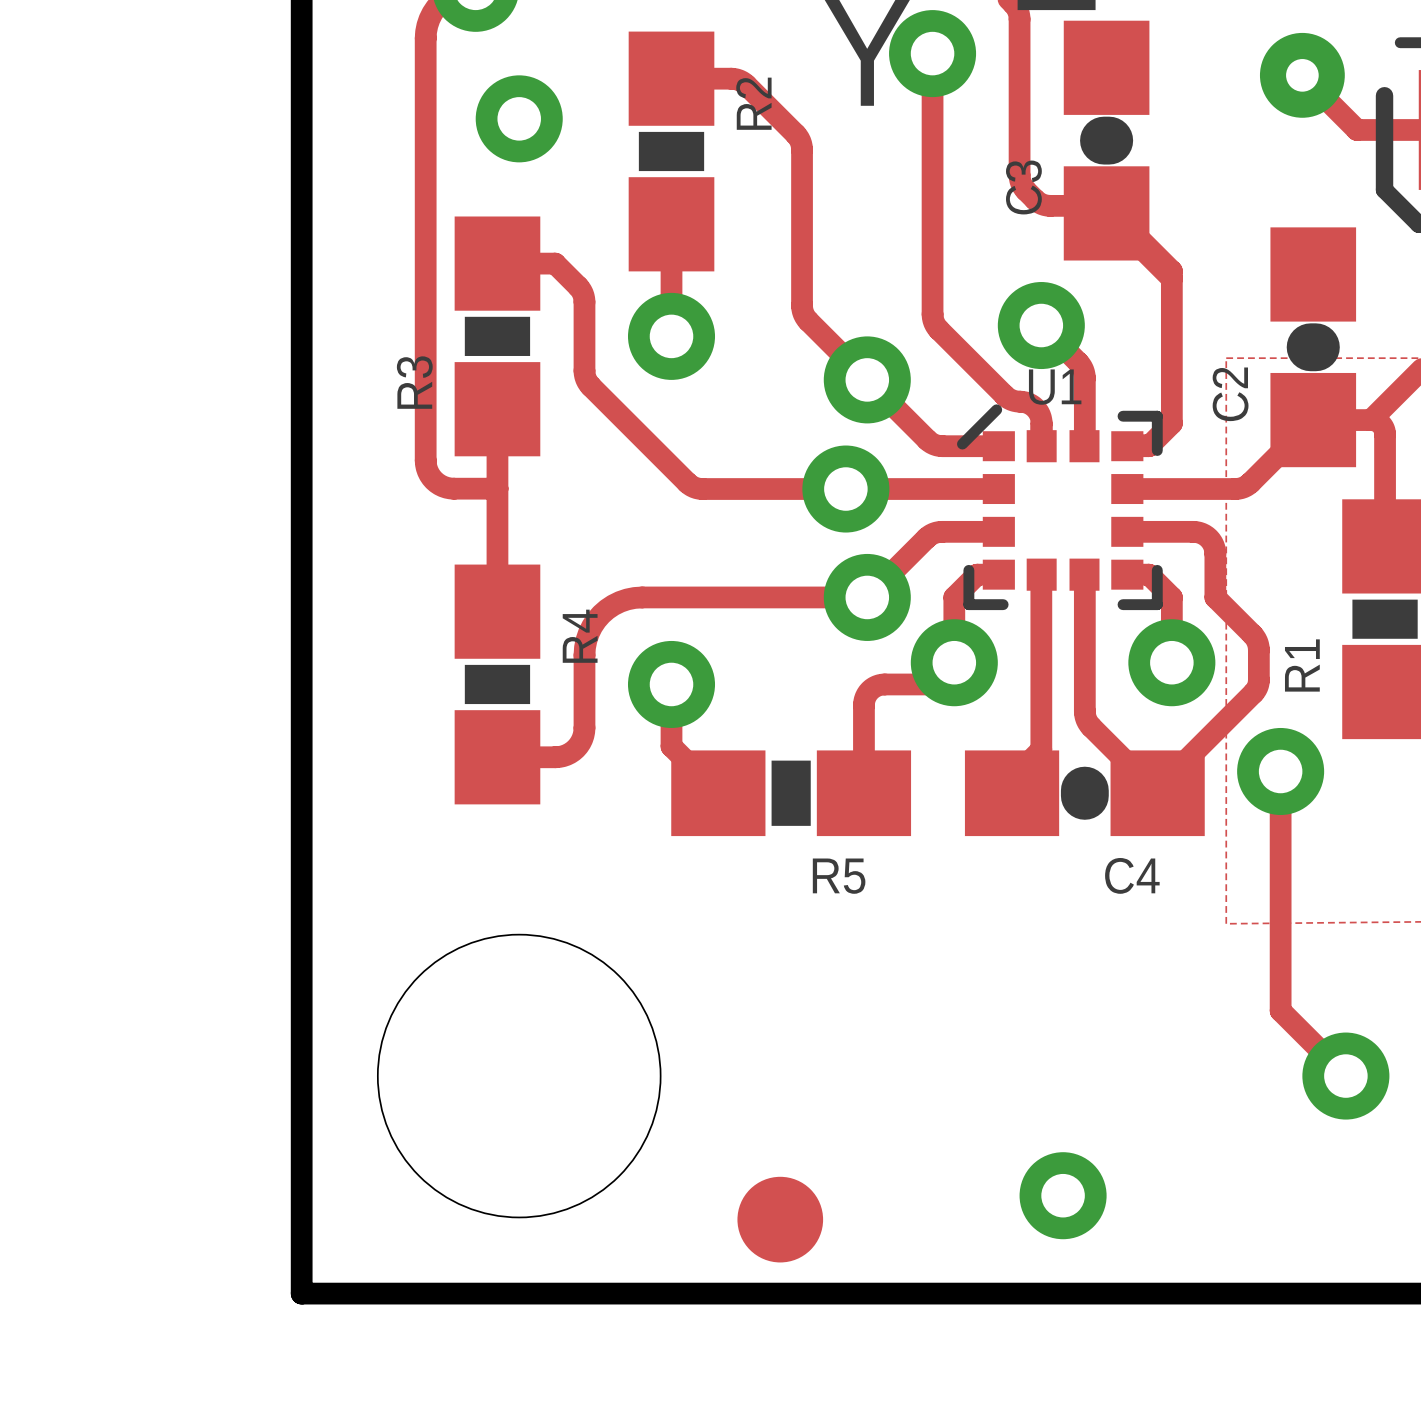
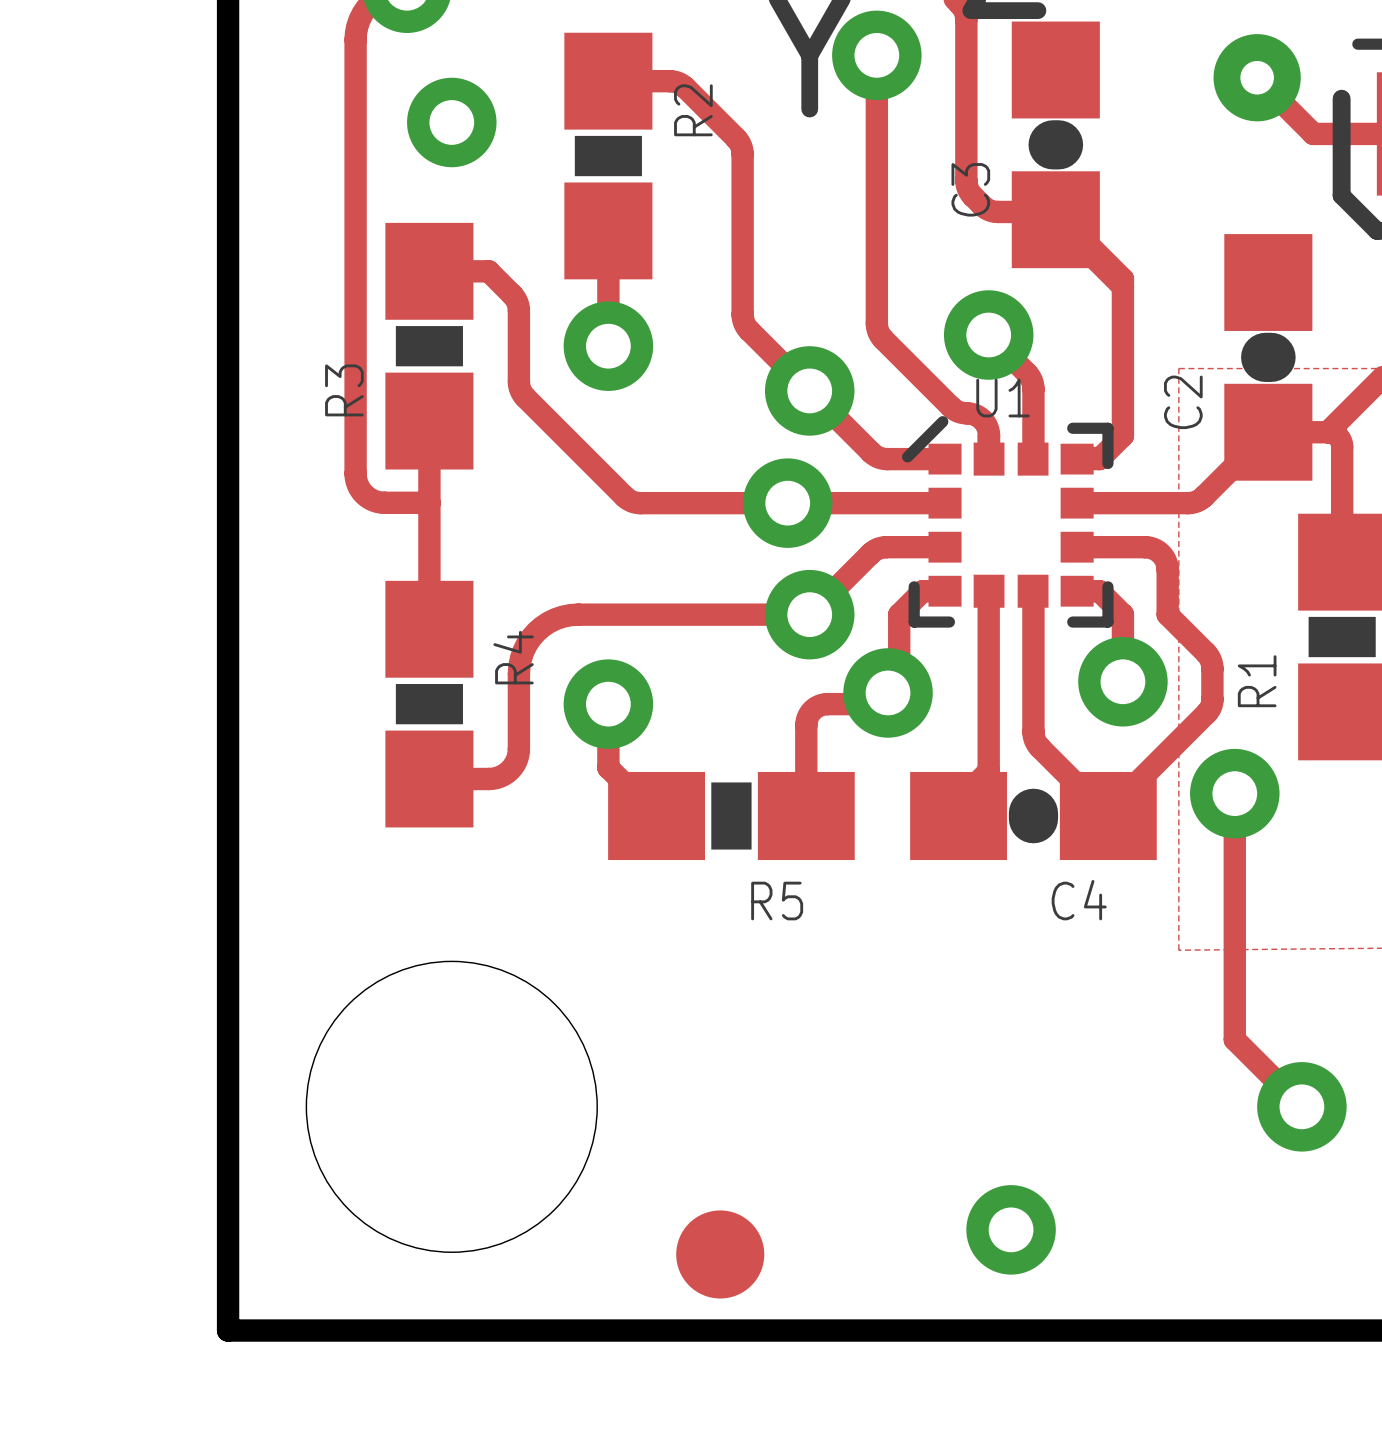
via position: (954, 662) -> (888, 692)

